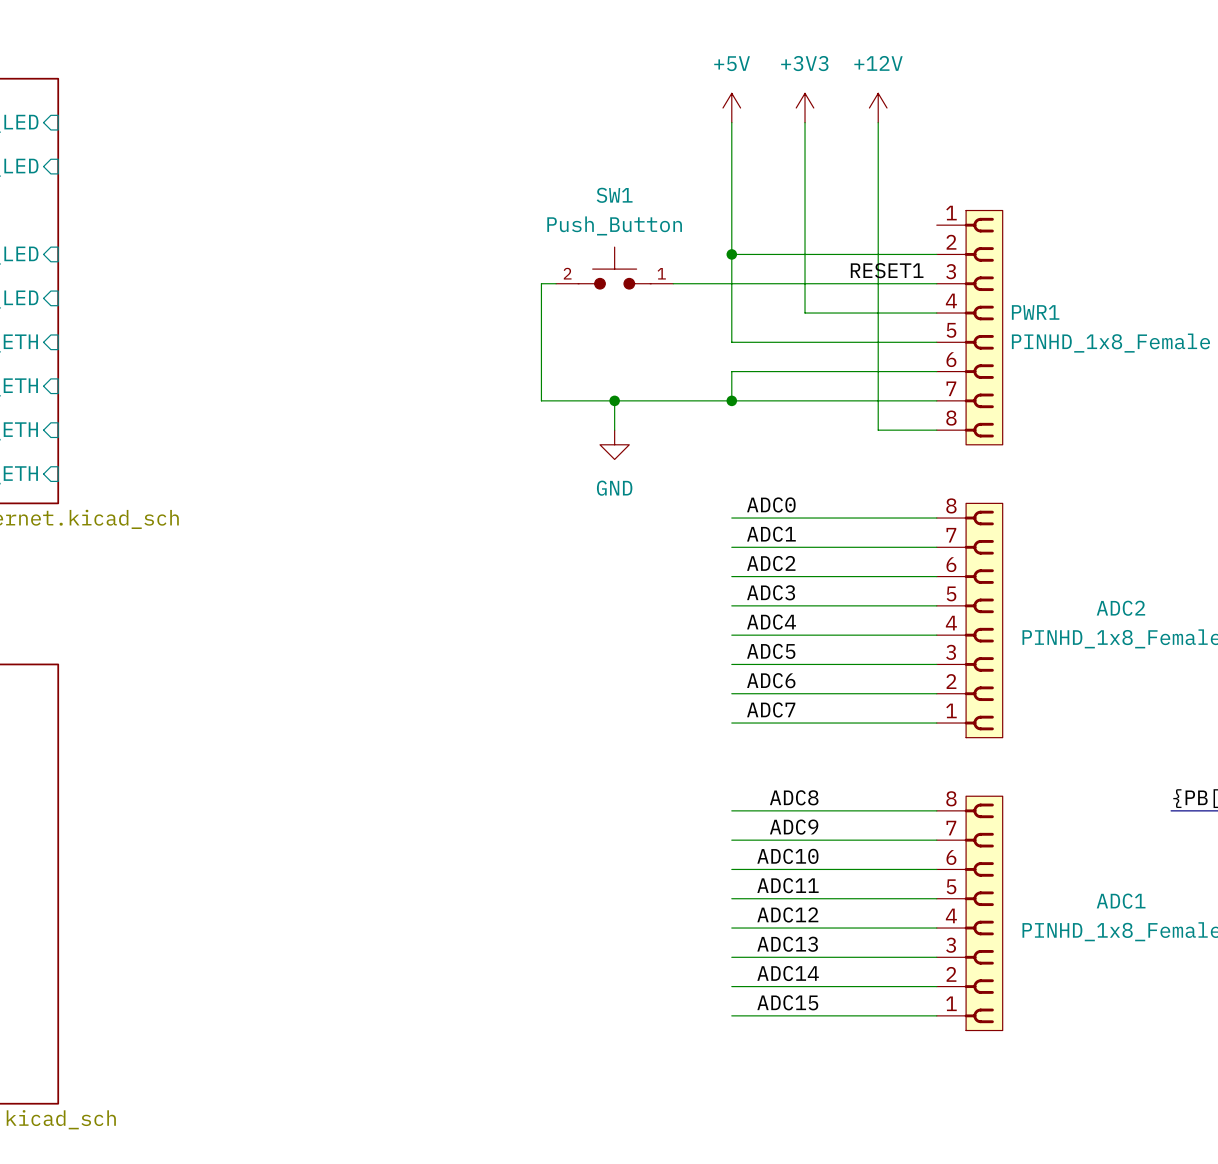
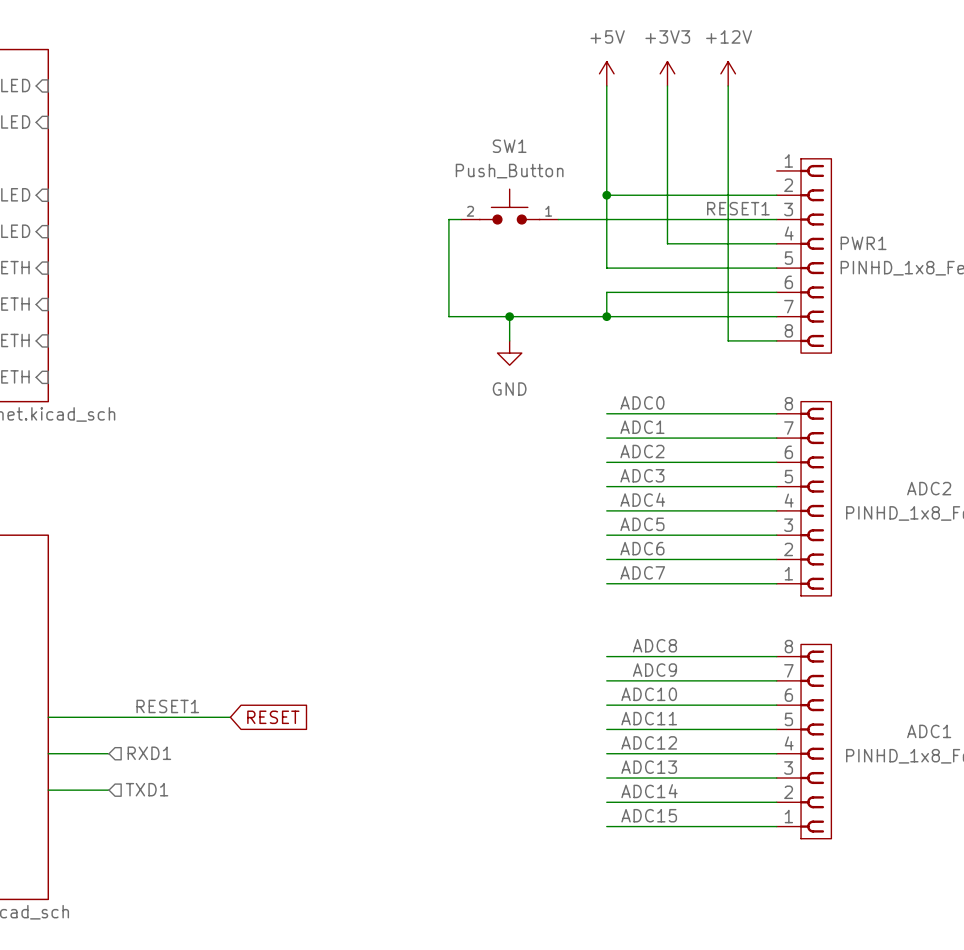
label: none -> RESET1 (167, 706)
wire: none -> (48, 717) (230, 717)
global label: none -> RESET (273, 717)
hierarchical label: none -> RXD1 (149, 753)
wire: none -> (48, 753) (109, 753)
wire: none -> (48, 790) (109, 790)
hierarchical label: none -> TXD1 (147, 789)

